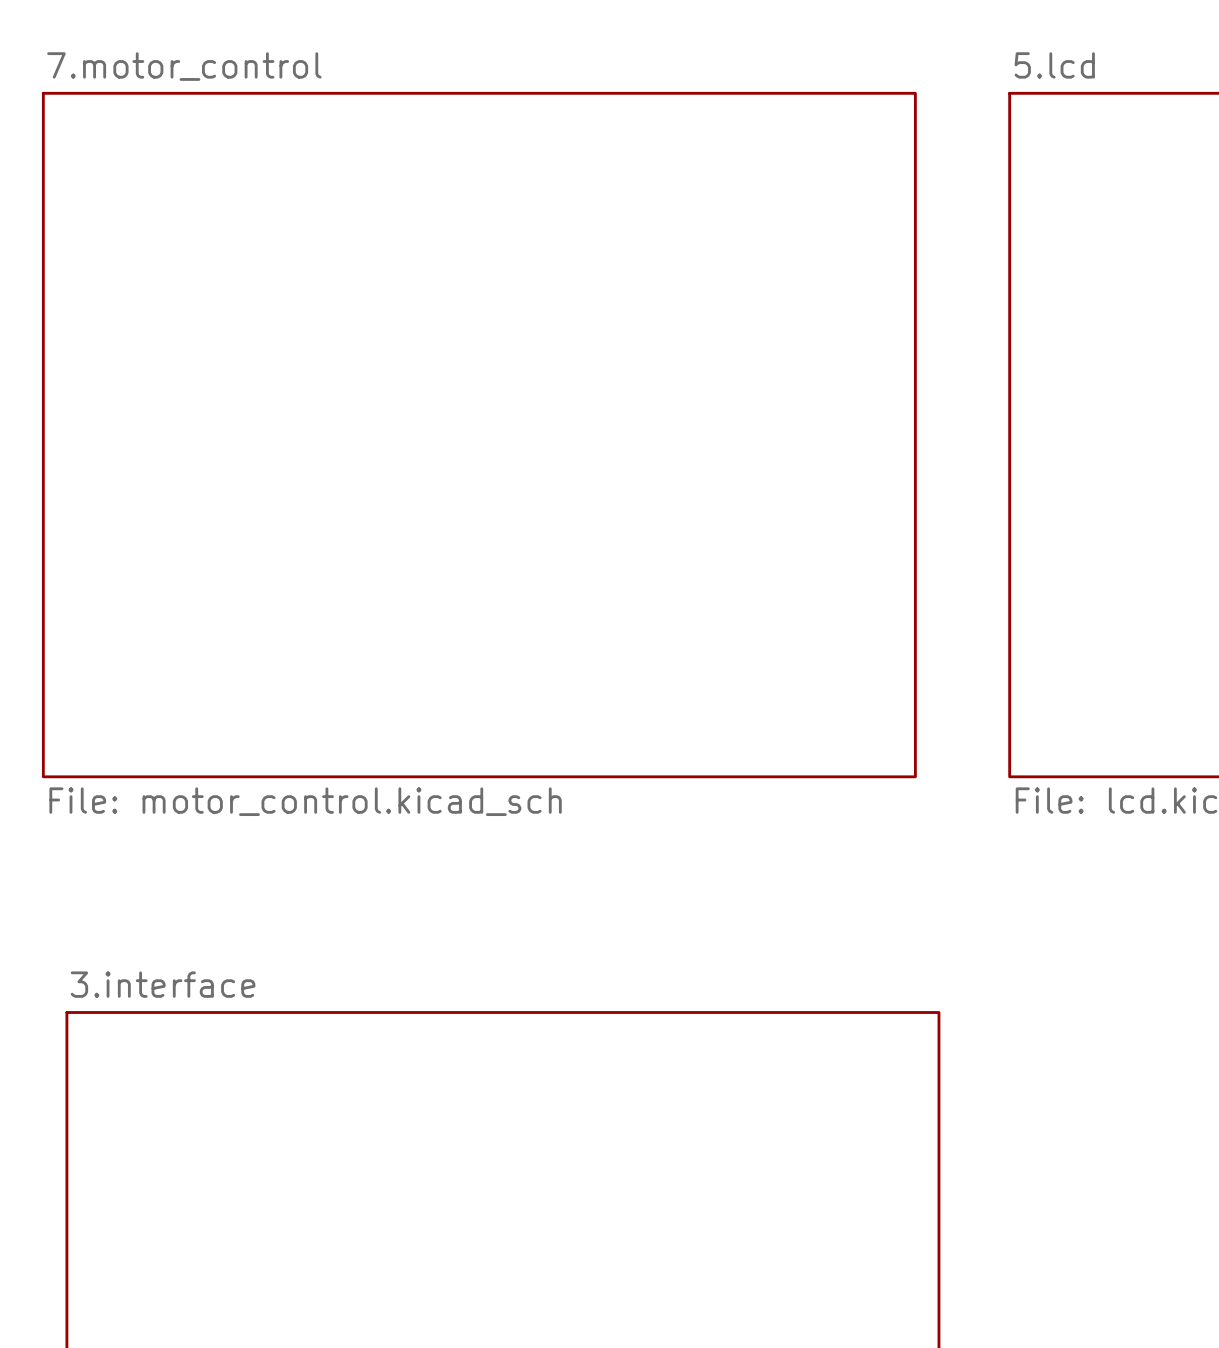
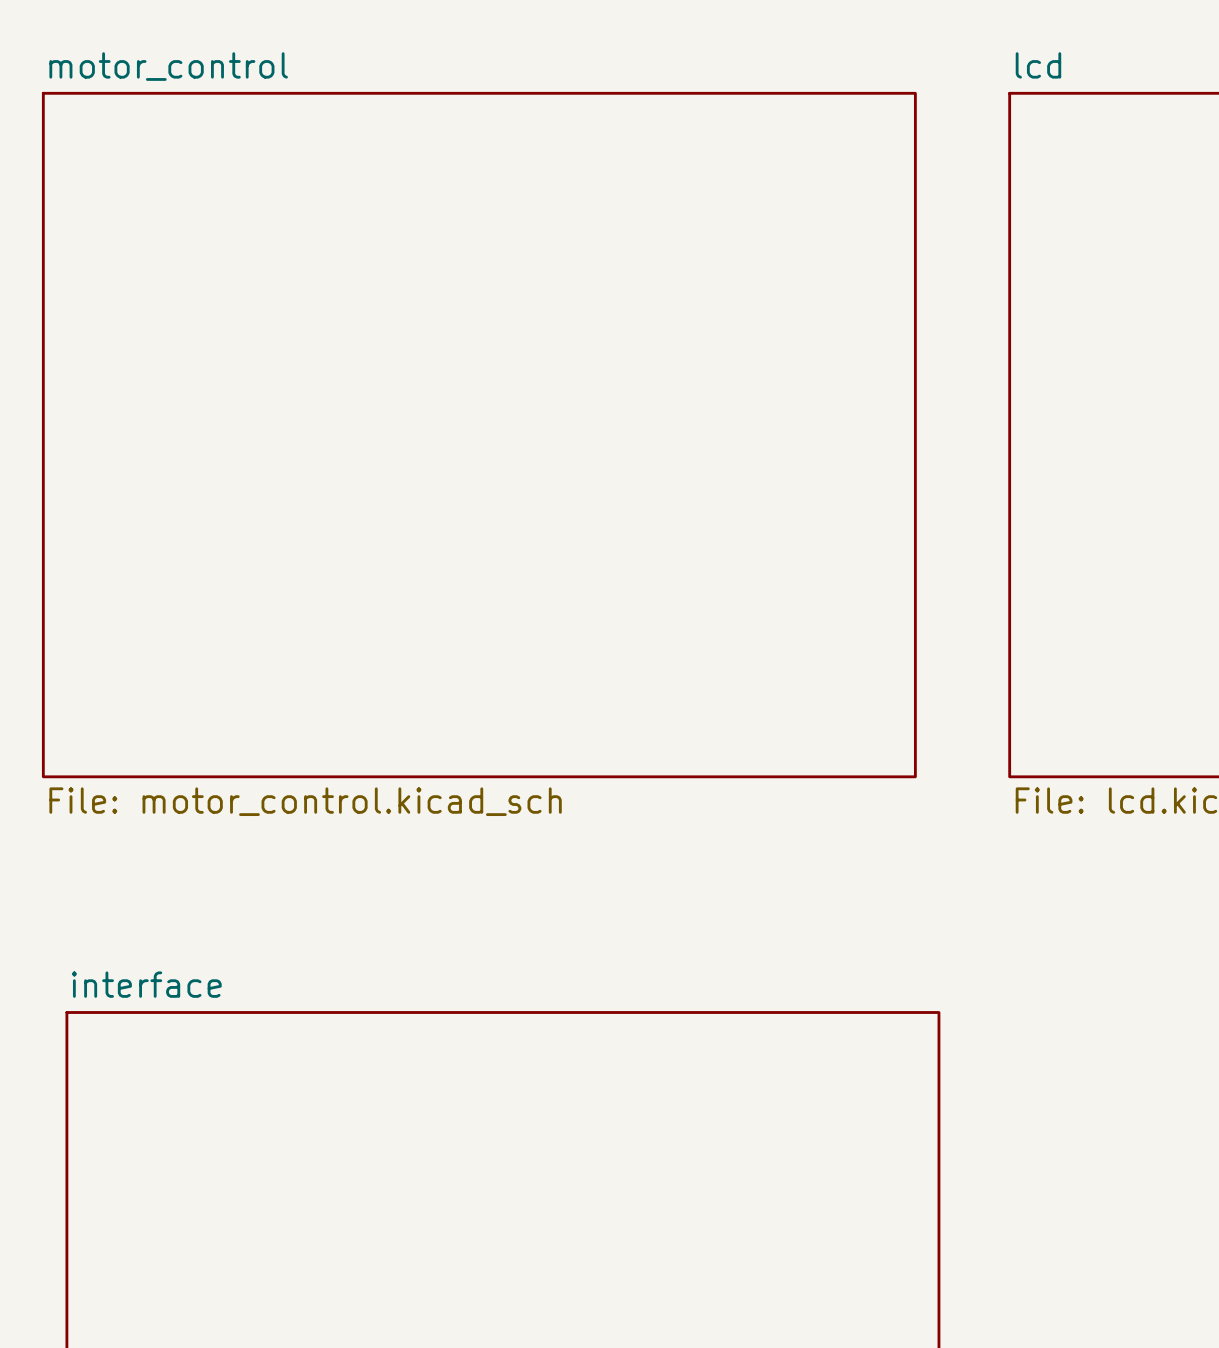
sheet 5.lcd name: 5.lcd (1054, 65) -> lcd (1038, 65)
sheet 7.motor_control name: 7.motor_control (184, 66) -> motor_control (168, 66)
sheet 3.interface name: 3.interface (163, 984) -> interface (146, 984)

